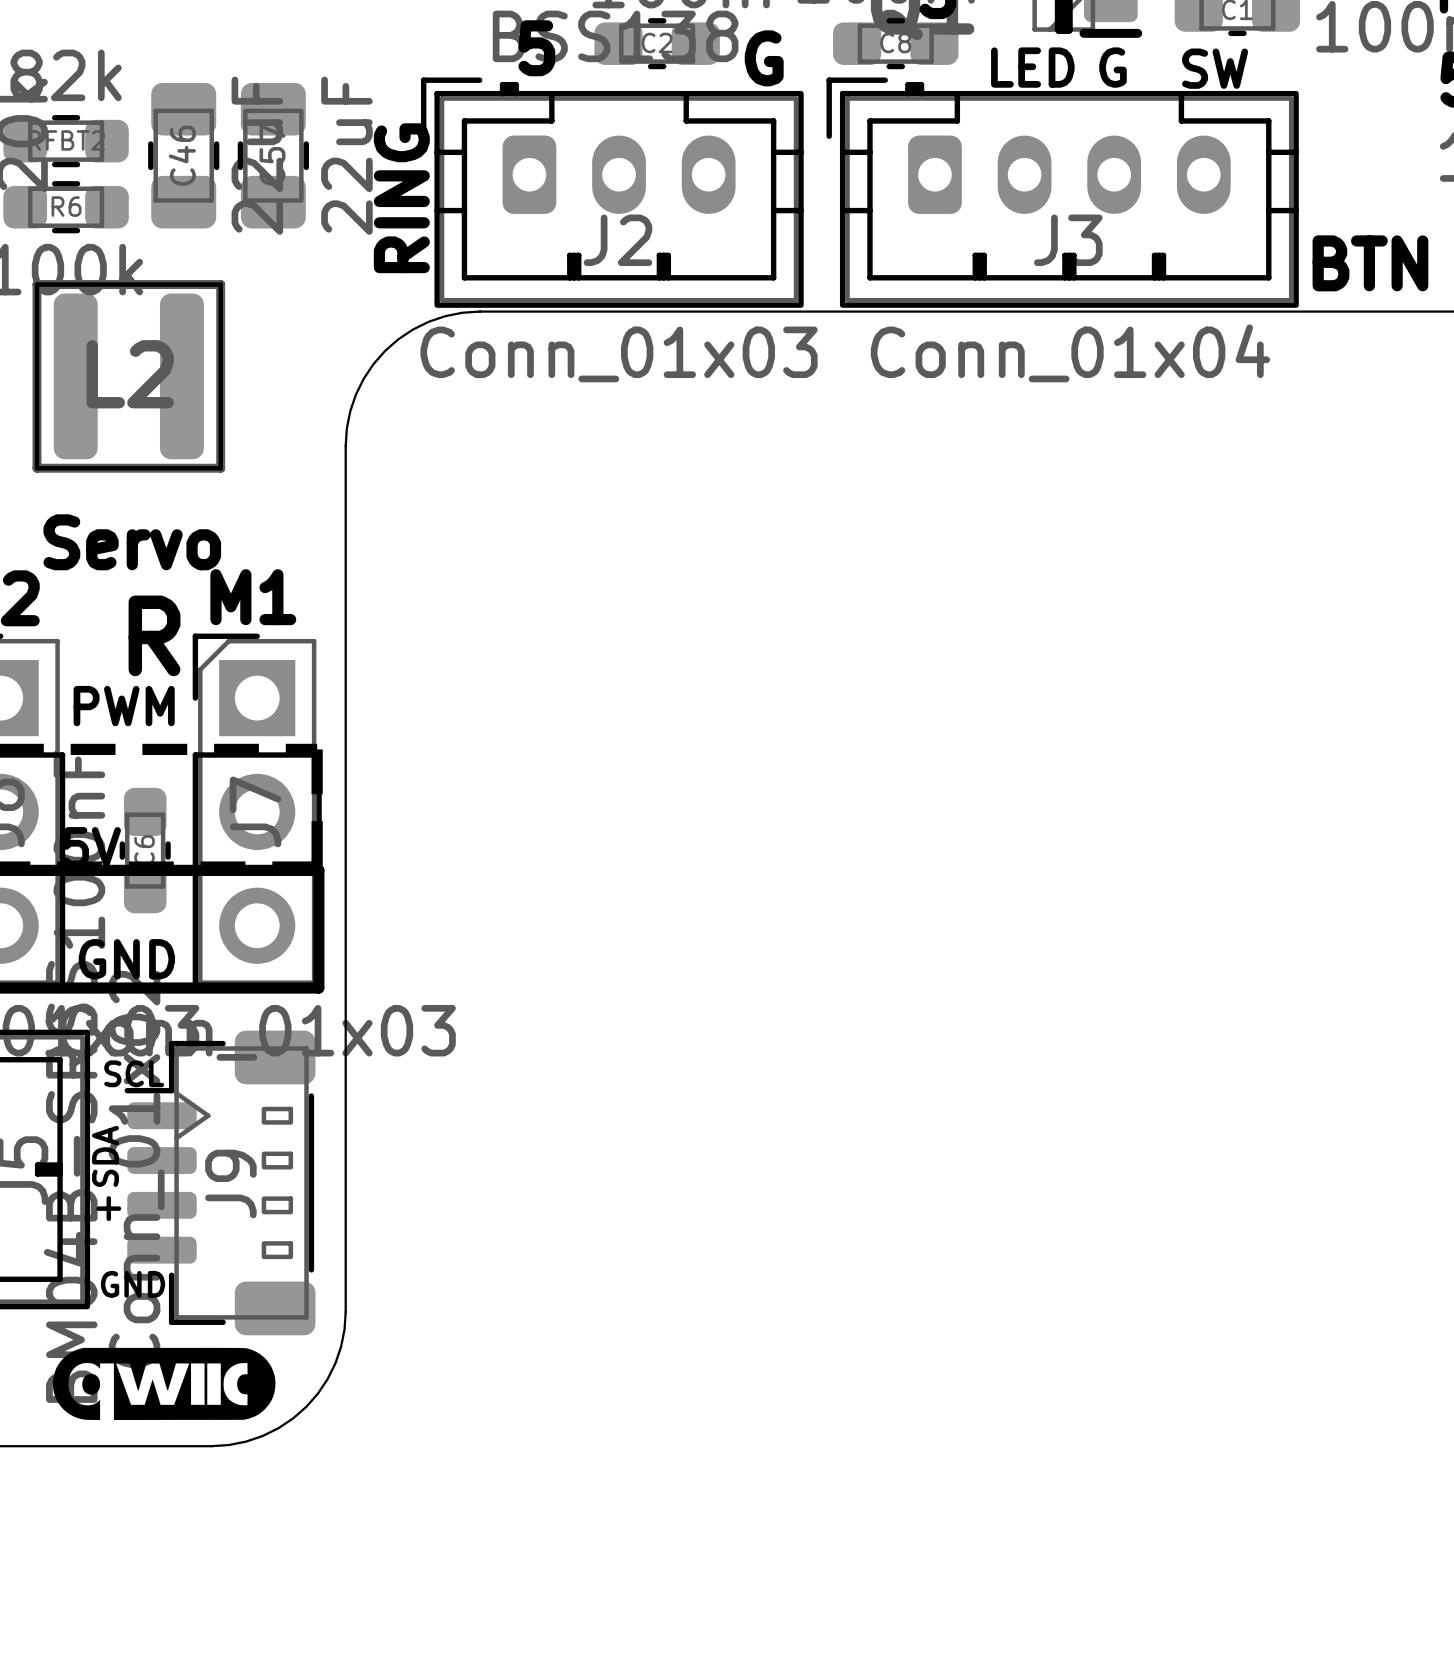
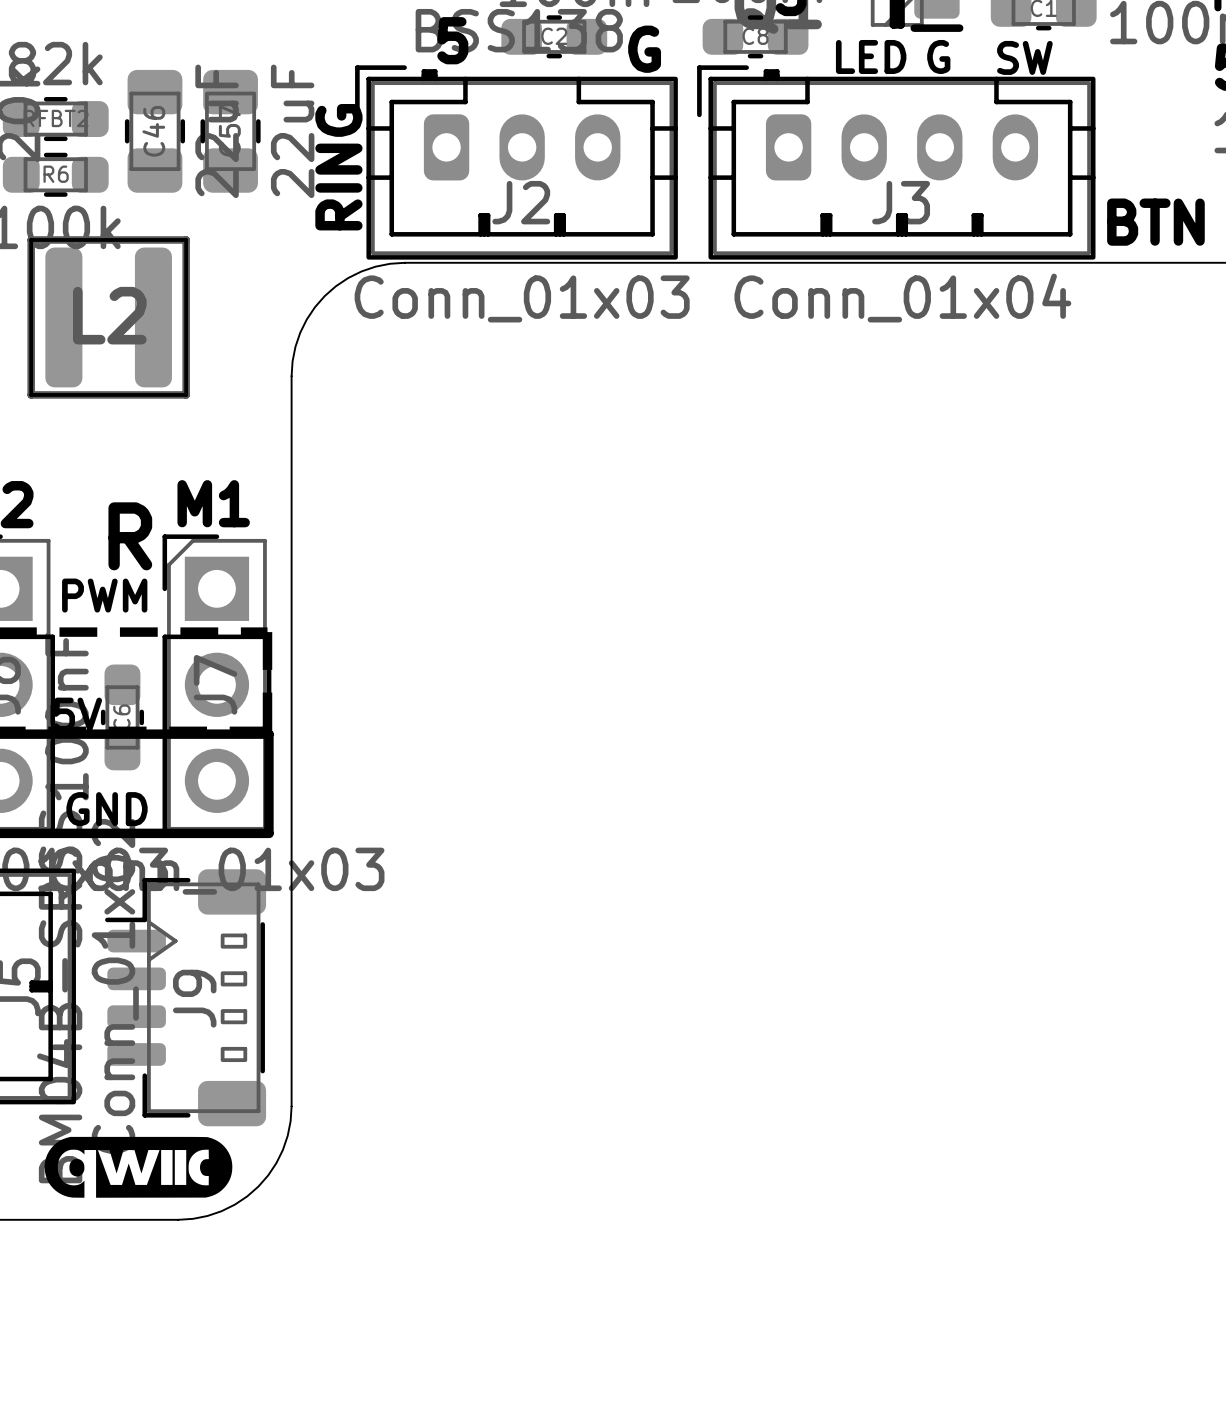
text: Servo (132, 542) -> none
text: SCL (134, 1073) -> none
text: SDA (105, 1156) -> none
text: + (108, 1208) -> none
text: GND (132, 1284) -> none

